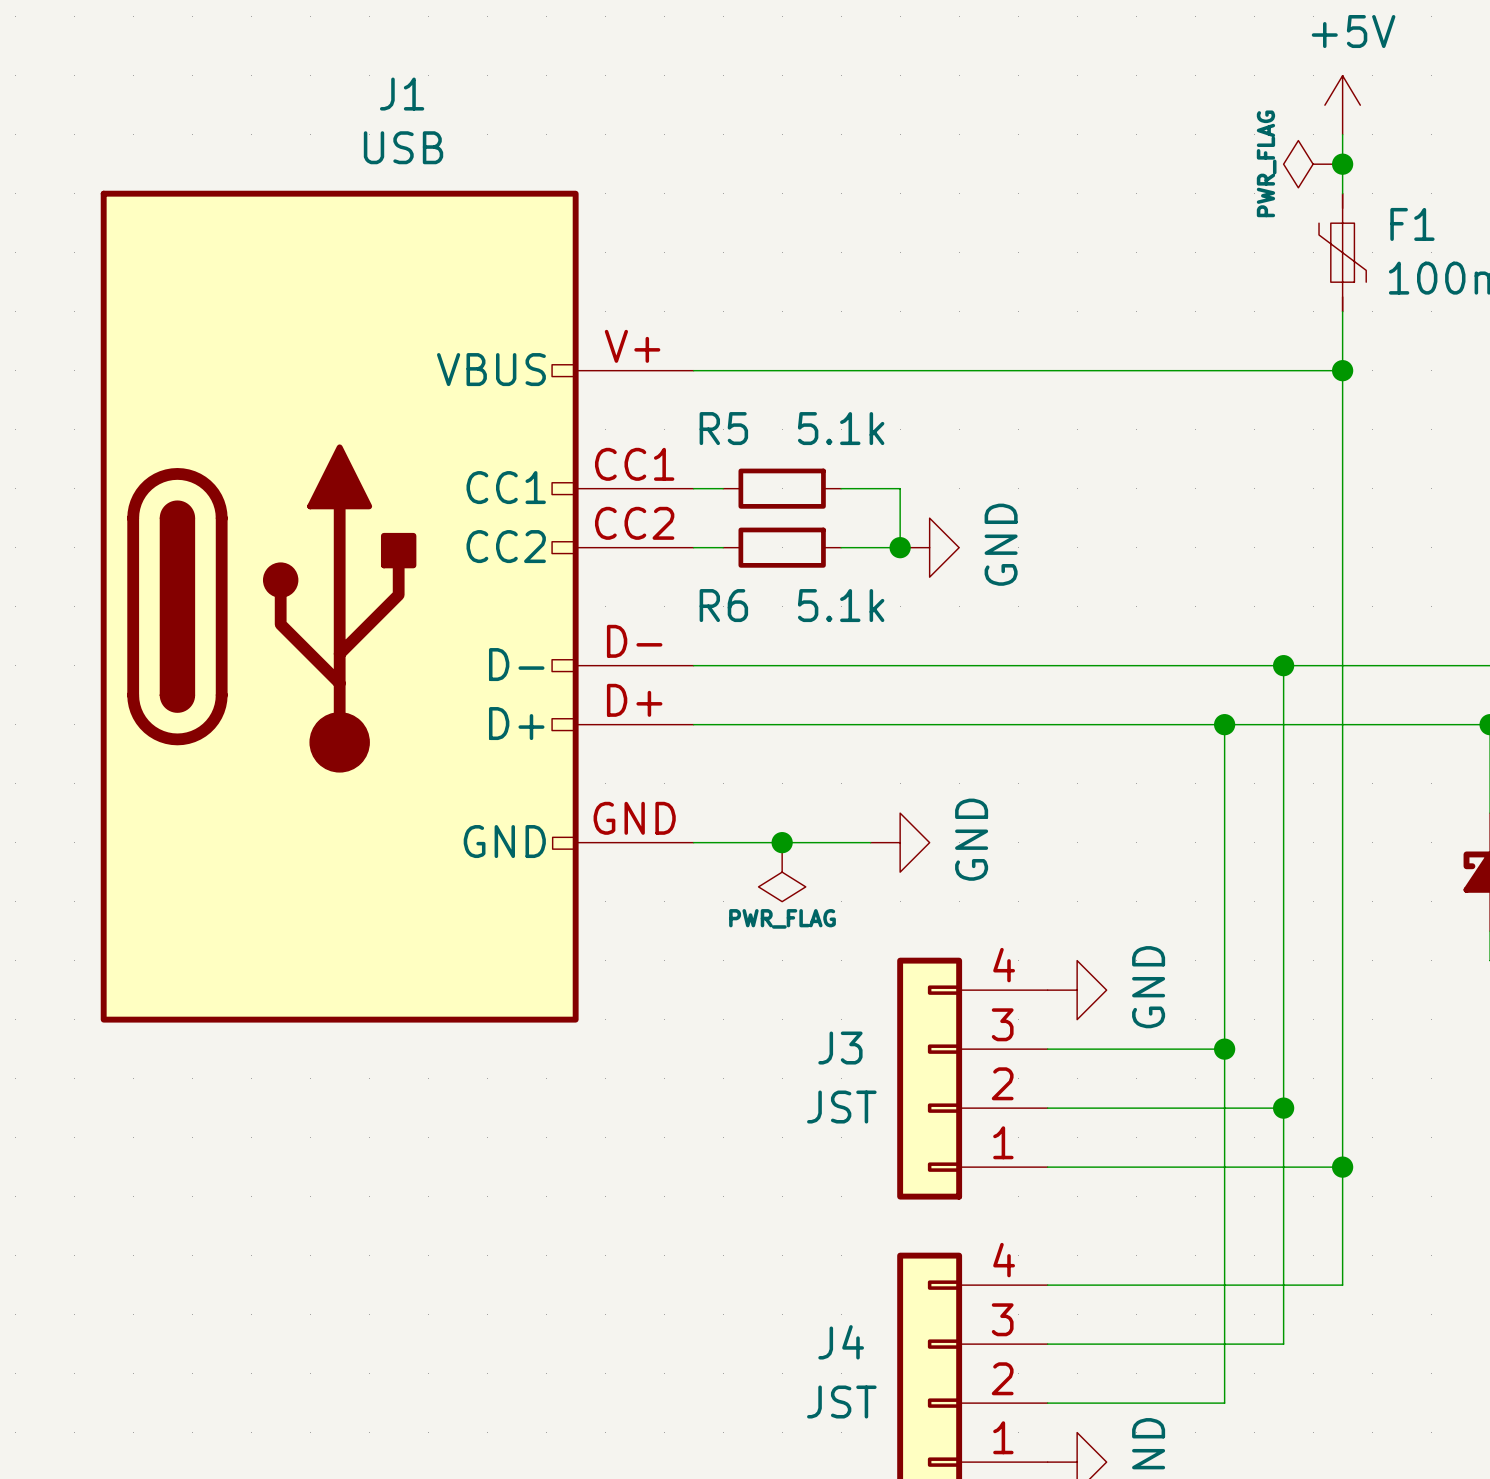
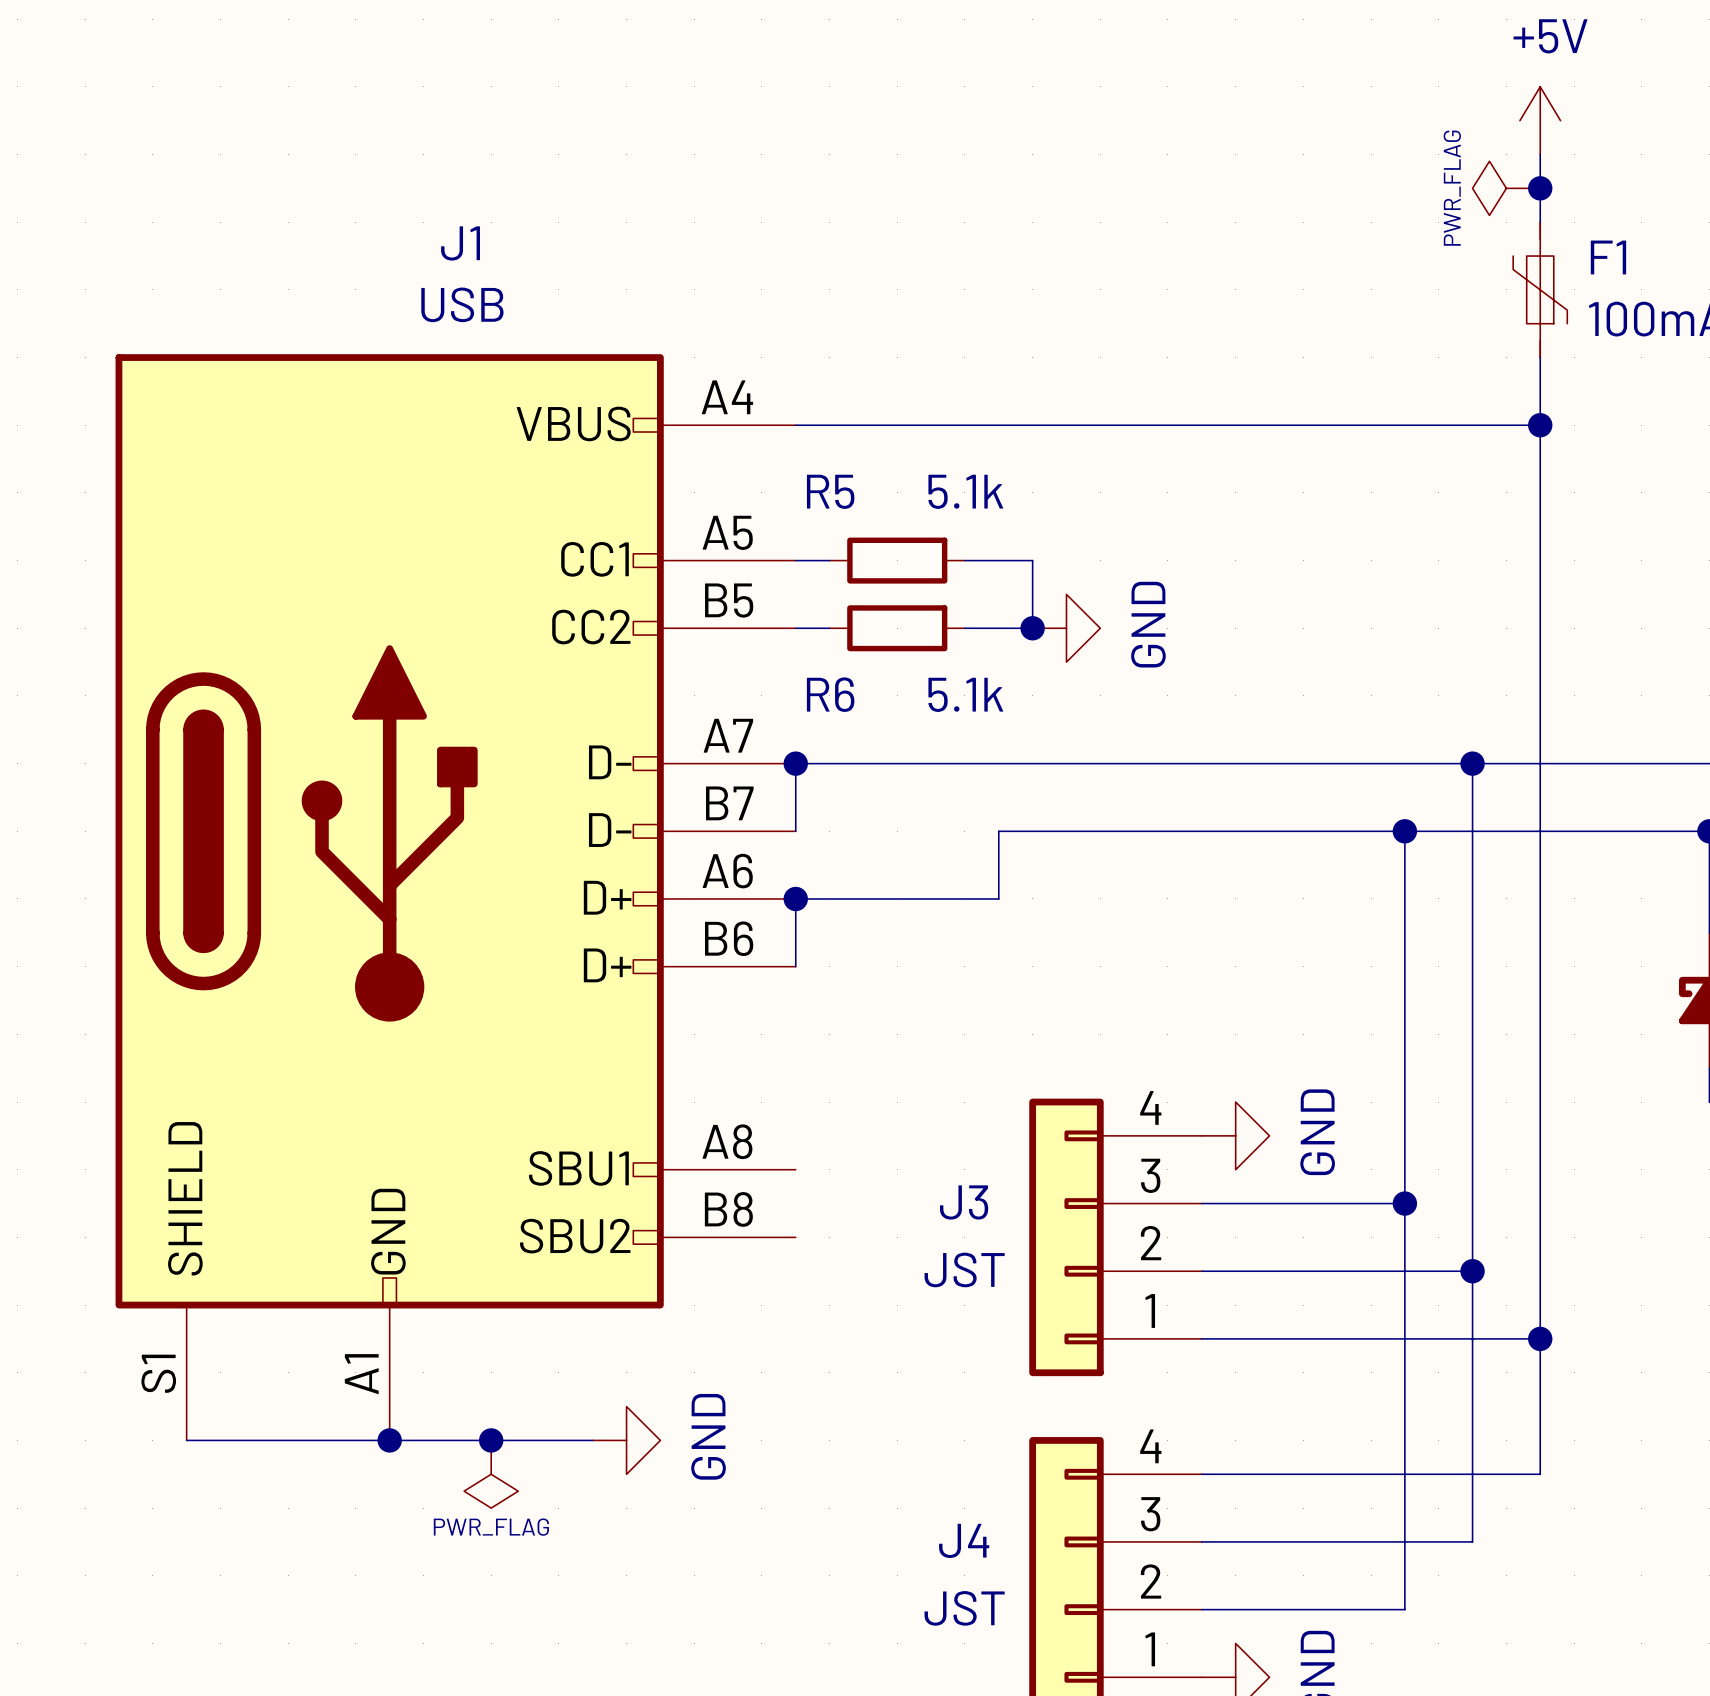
J1 name position: J1 (402, 94) -> J1 (460, 243)
J1 value position: USB (403, 147) -> USB (462, 304)
J1 symbol: [100, 190, 694, 1023] -> [115, 354, 796, 1441]
wire: none -> (795, 763) (795, 831)
junction: none -> (795, 763)
wire: (693, 724) (870, 724) -> (795, 966) (795, 898) (998, 898) (998, 831)
junction: none -> (795, 898)
wire: (693, 842) (870, 842) -> none
junction: (782, 842) -> none
power symbol position: GND (900, 842) -> GND (626, 1440)
power symbol position: PWR_FLAG (782, 872) -> PWR_FLAG (491, 1474)
wire: none -> (186, 1440) (592, 1440)
junction: none -> (389, 1440)
junction: none -> (491, 1440)

